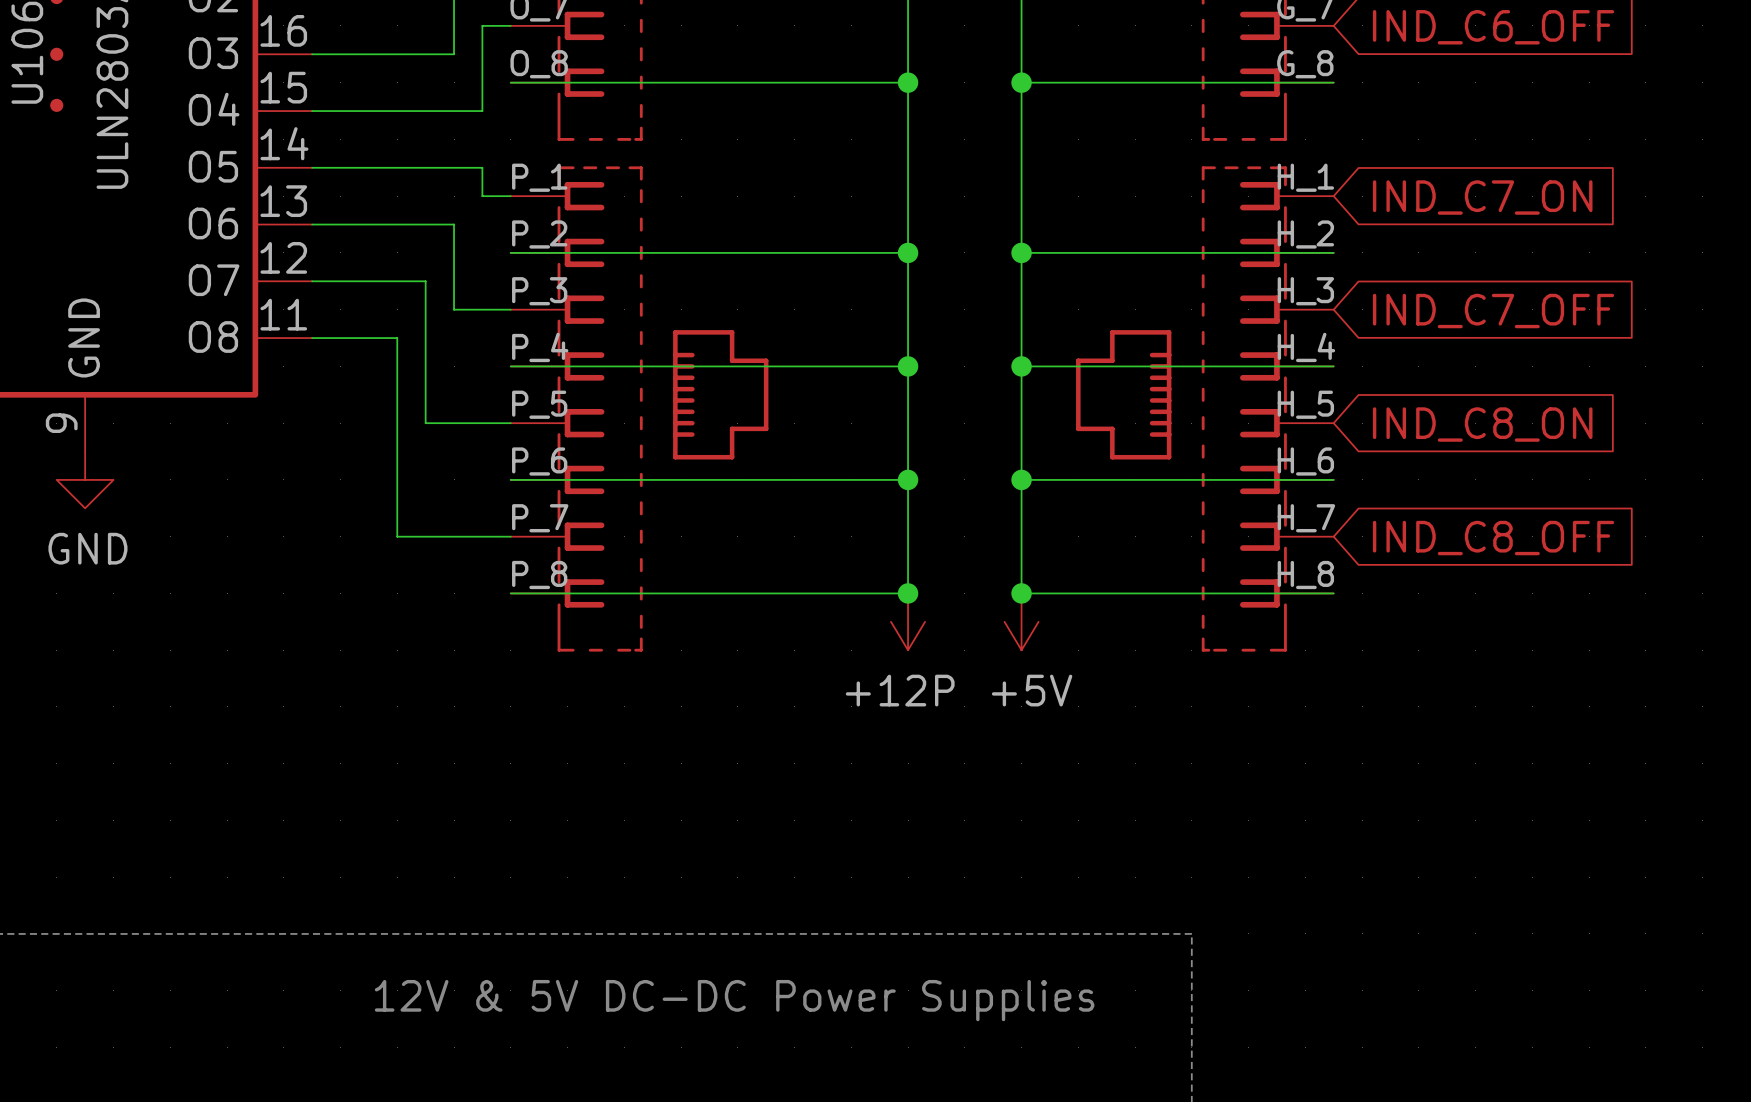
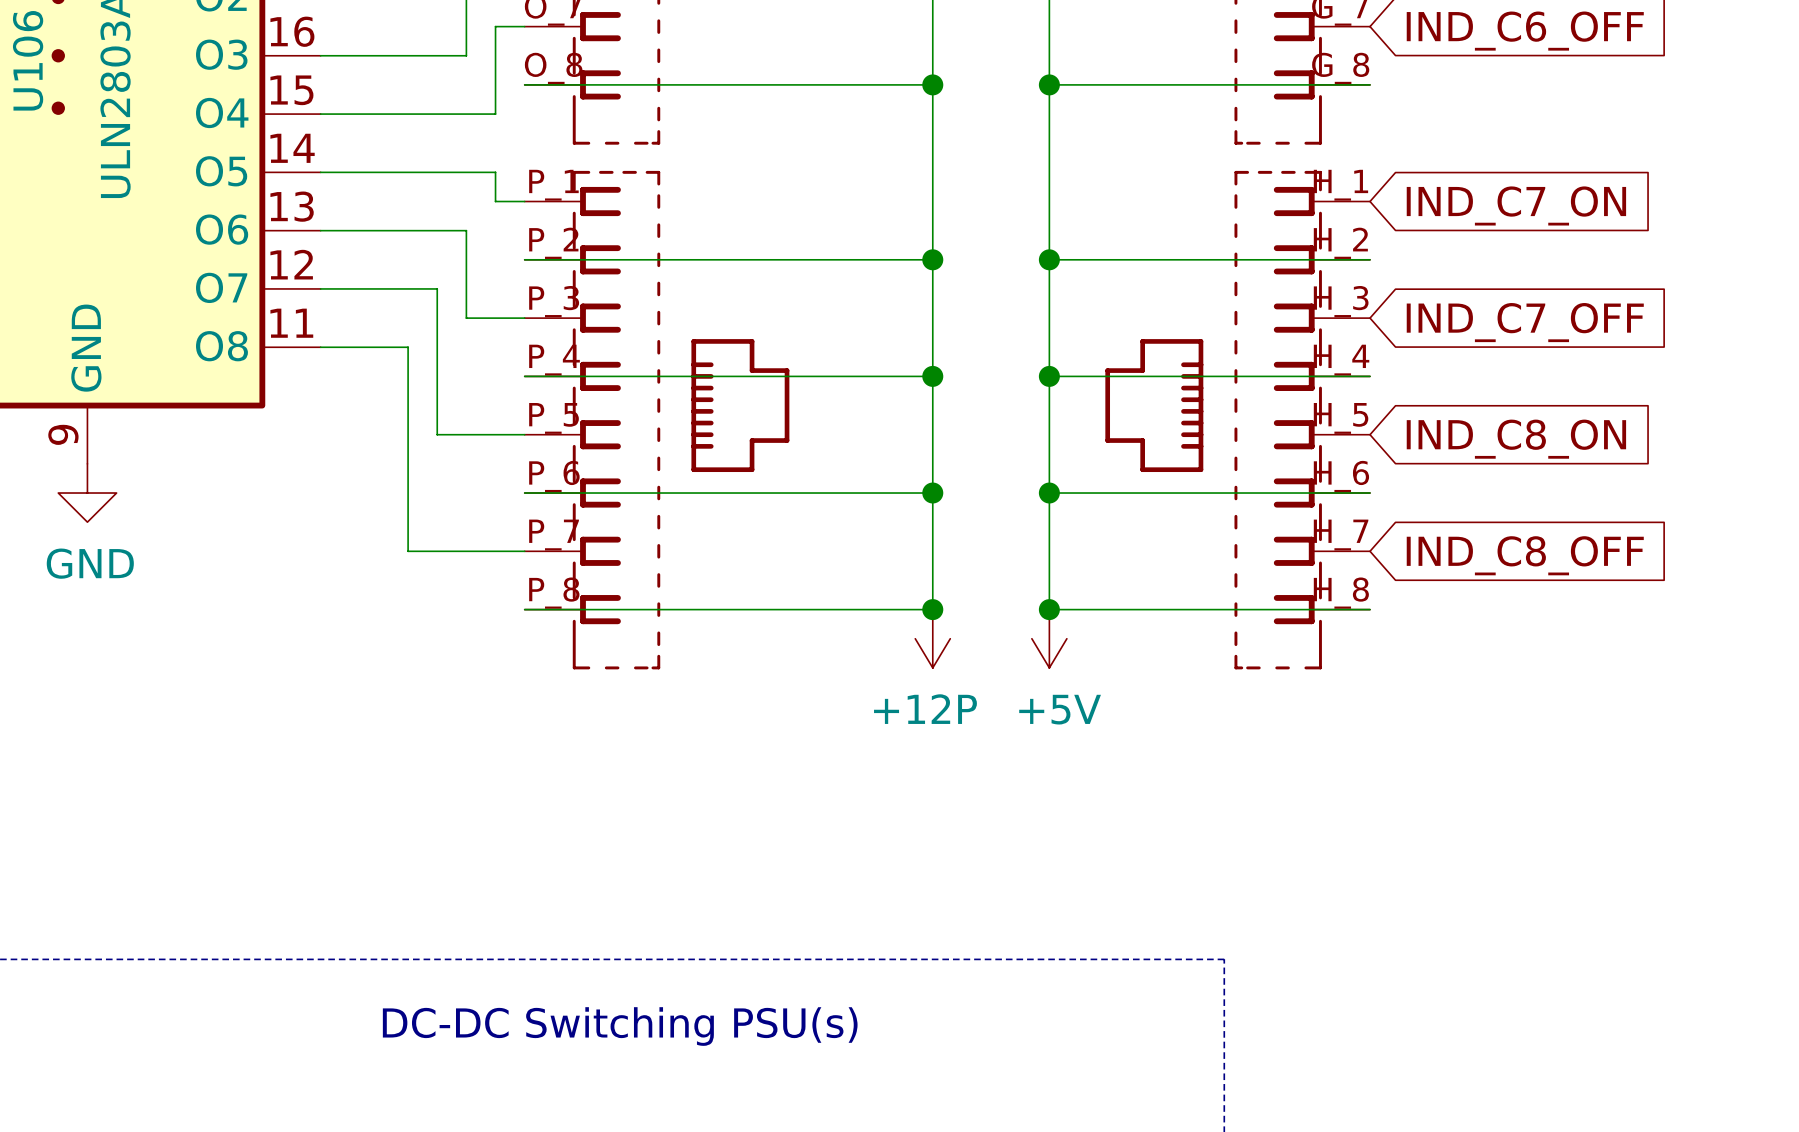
text: 12V & 5V DC-DC Power Supplies (734, 1000) -> DC-DC Switching PSU(s) (620, 1026)

